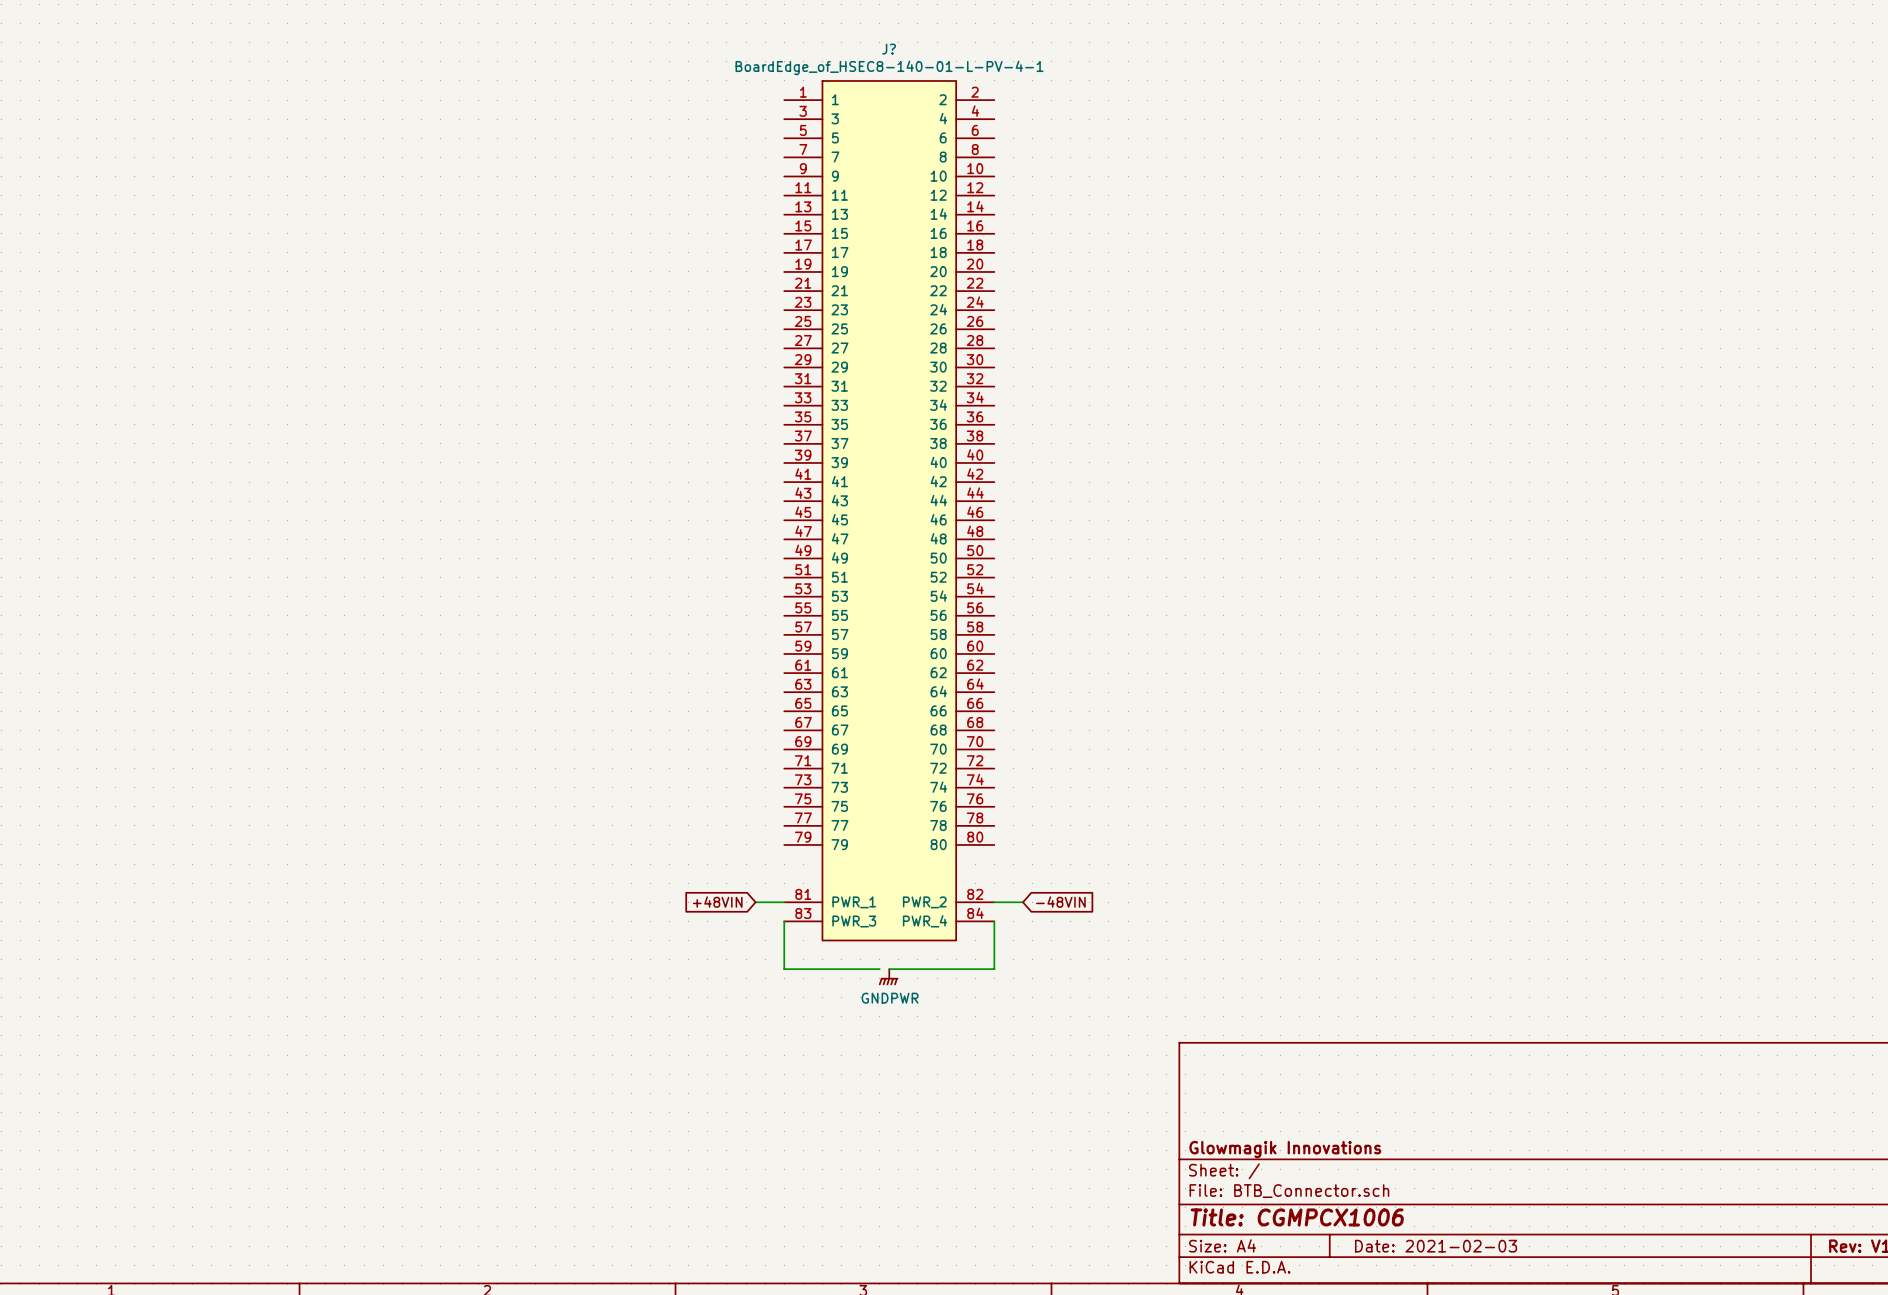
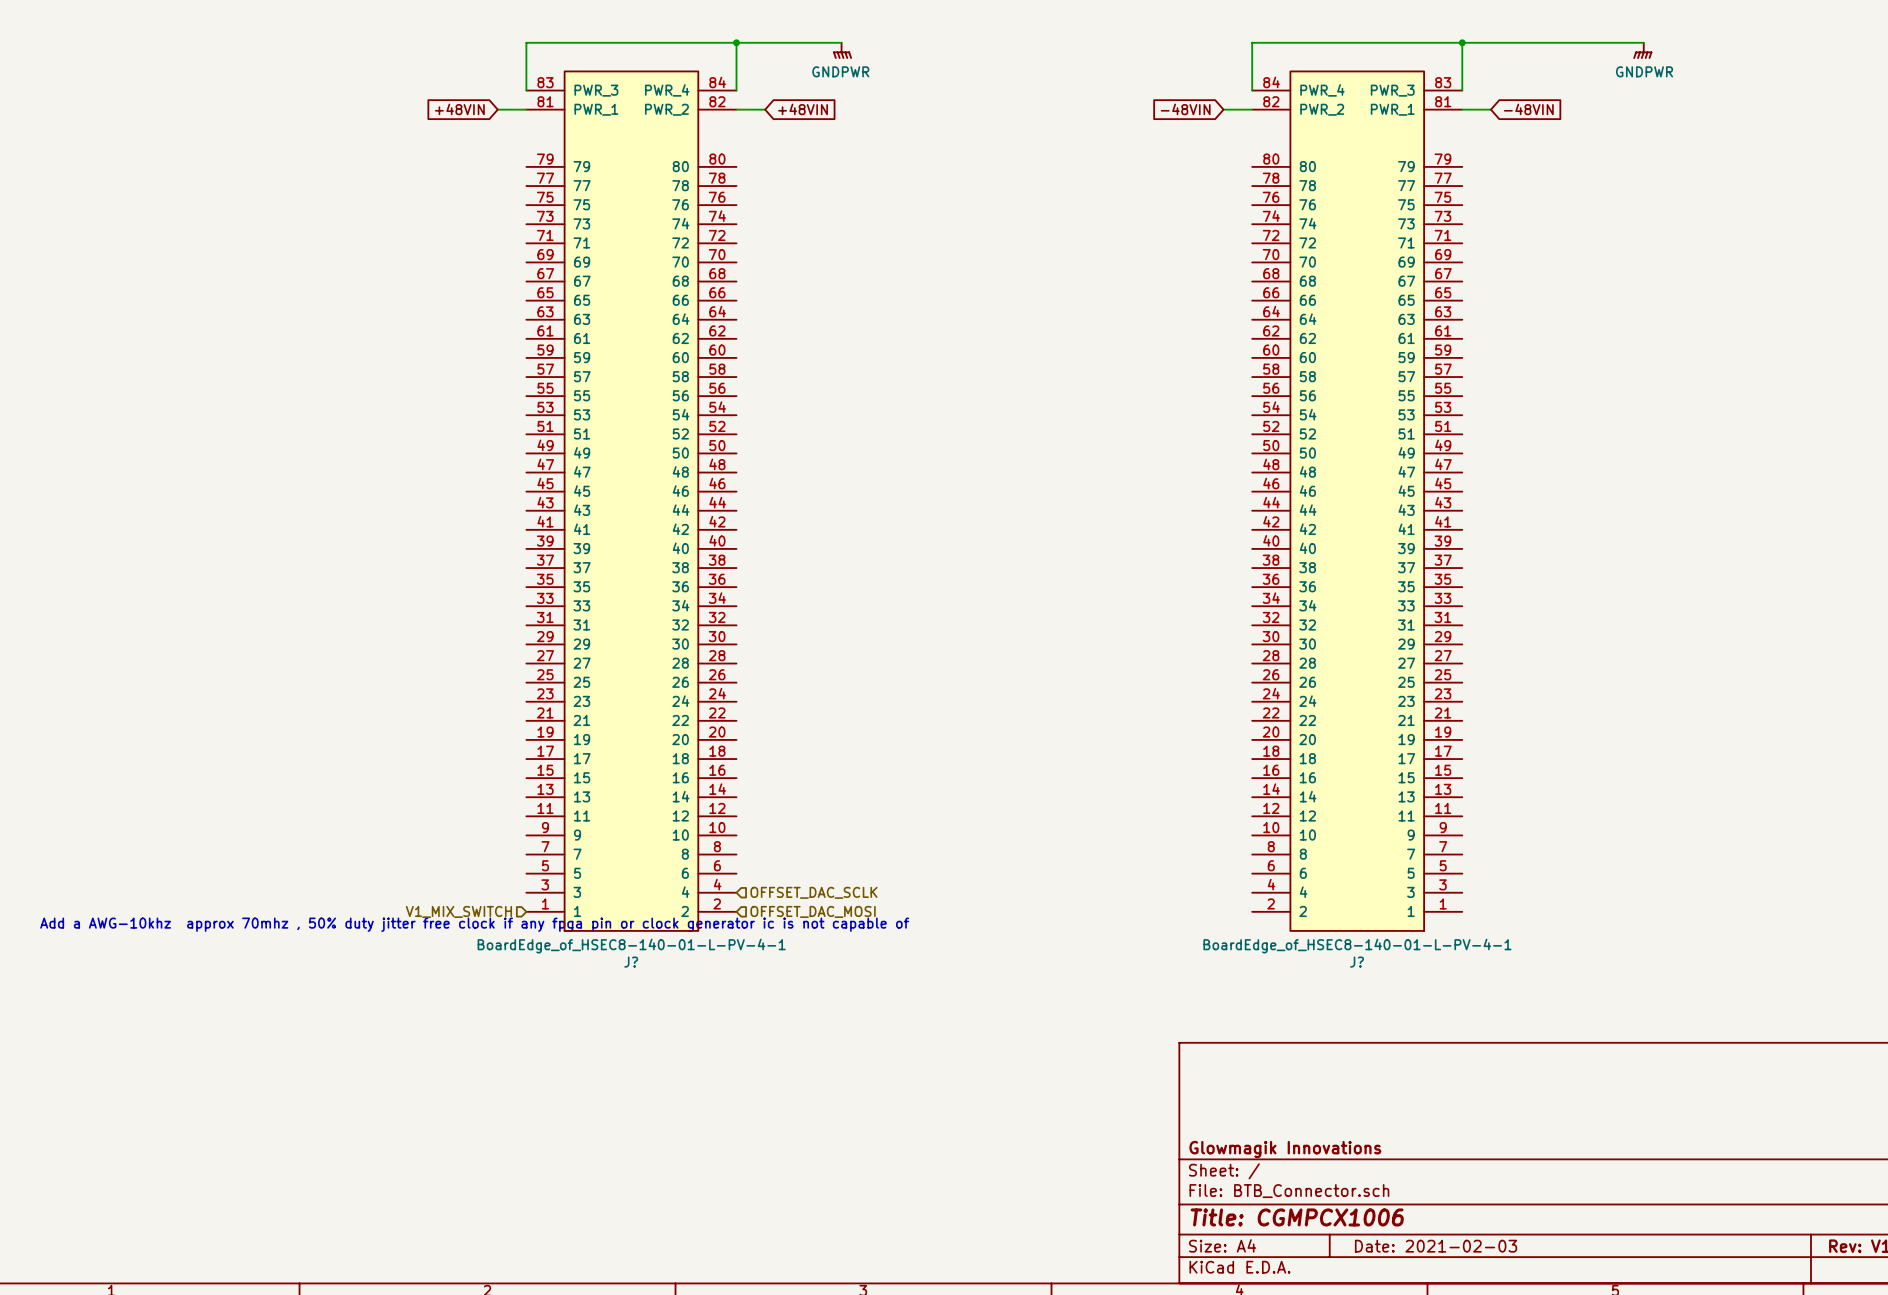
wire: none -> (736, 42) (736, 90)
junction: none -> (736, 42)
wire: none -> (841, 42) (526, 42) (526, 90)
wire: none -> (1462, 42) (1462, 90)
junction: none -> (1462, 42)
wire: none -> (1643, 42) (1252, 42) (1252, 90)
power symbol: none -> GNDPWR (842, 50)
power symbol: none -> GNDPWR (1642, 50)
global label: none -> +48VIN (459, 109)
wire: none -> (497, 109) (526, 109)
wire: none -> (736, 109) (765, 109)
global label: none -> +48VIN (803, 109)
global label: none -> -48VIN (1185, 109)
wire: none -> (1223, 109) (1252, 109)
wire: none -> (1462, 109) (1490, 109)
global label: none -> -48VIN (1528, 109)
J?: none -> BoardEdge_of_HSEC8-140-01-L-PV-4-1 (631, 501)
J?: none -> BoardEdge_of_HSEC8-140-01-L-PV-4-1 (1357, 501)
J?: BoardEdge_of_HSEC8-140-01-L-PV-4-1 (889, 510) -> none
hierarchical label: none -> OFFSET_DAC_SCLK (813, 892)
global label: +48VIN (717, 902) -> none
wire: (755, 902) (784, 902) -> none
wire: (994, 902) (1023, 902) -> none
global label: -48VIN (1060, 902) -> none
hierarchical label: none -> V1_MIX_SWITCH (458, 911)
hierarchical label: none -> OFFSET_DAC_MOSI (813, 911)
wire: (784, 921) (784, 969) (879, 969) -> none
wire: (994, 921) (994, 969) (889, 969) -> none
text: none -> Add a AWG-10khz approx 70mhz , 50% duty jitter free clock if any fpga pin or clock generator ic is not capable of (474, 924)
power symbol: GNDPWR (888, 977) -> none

